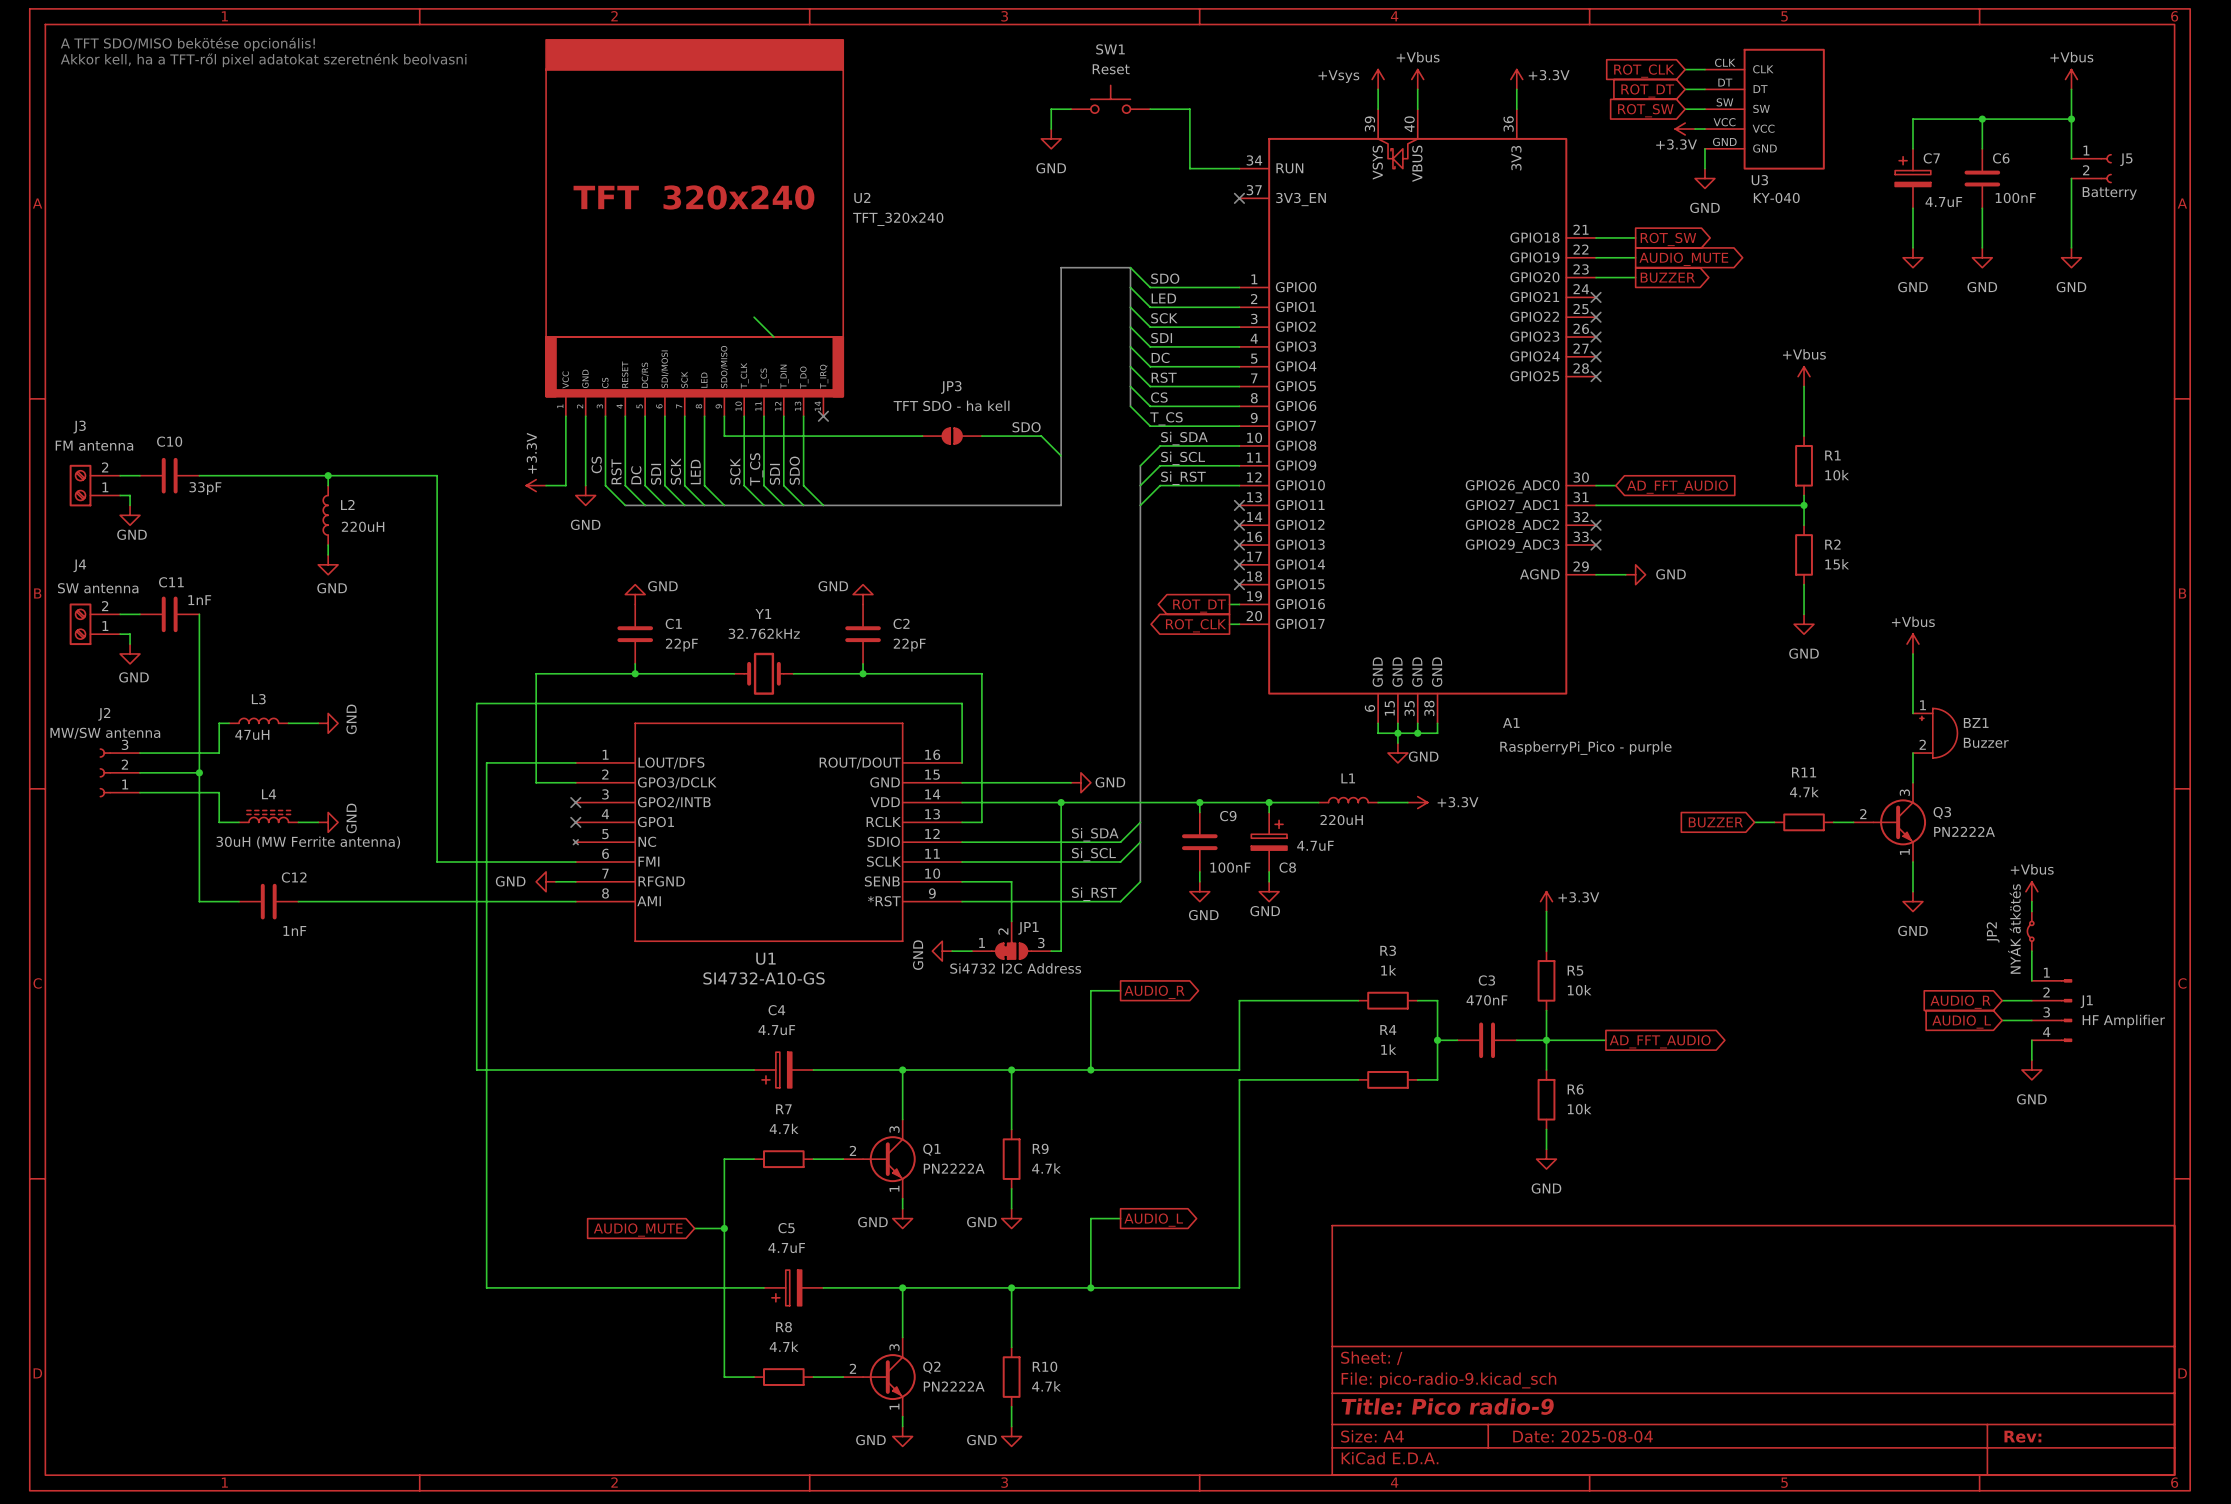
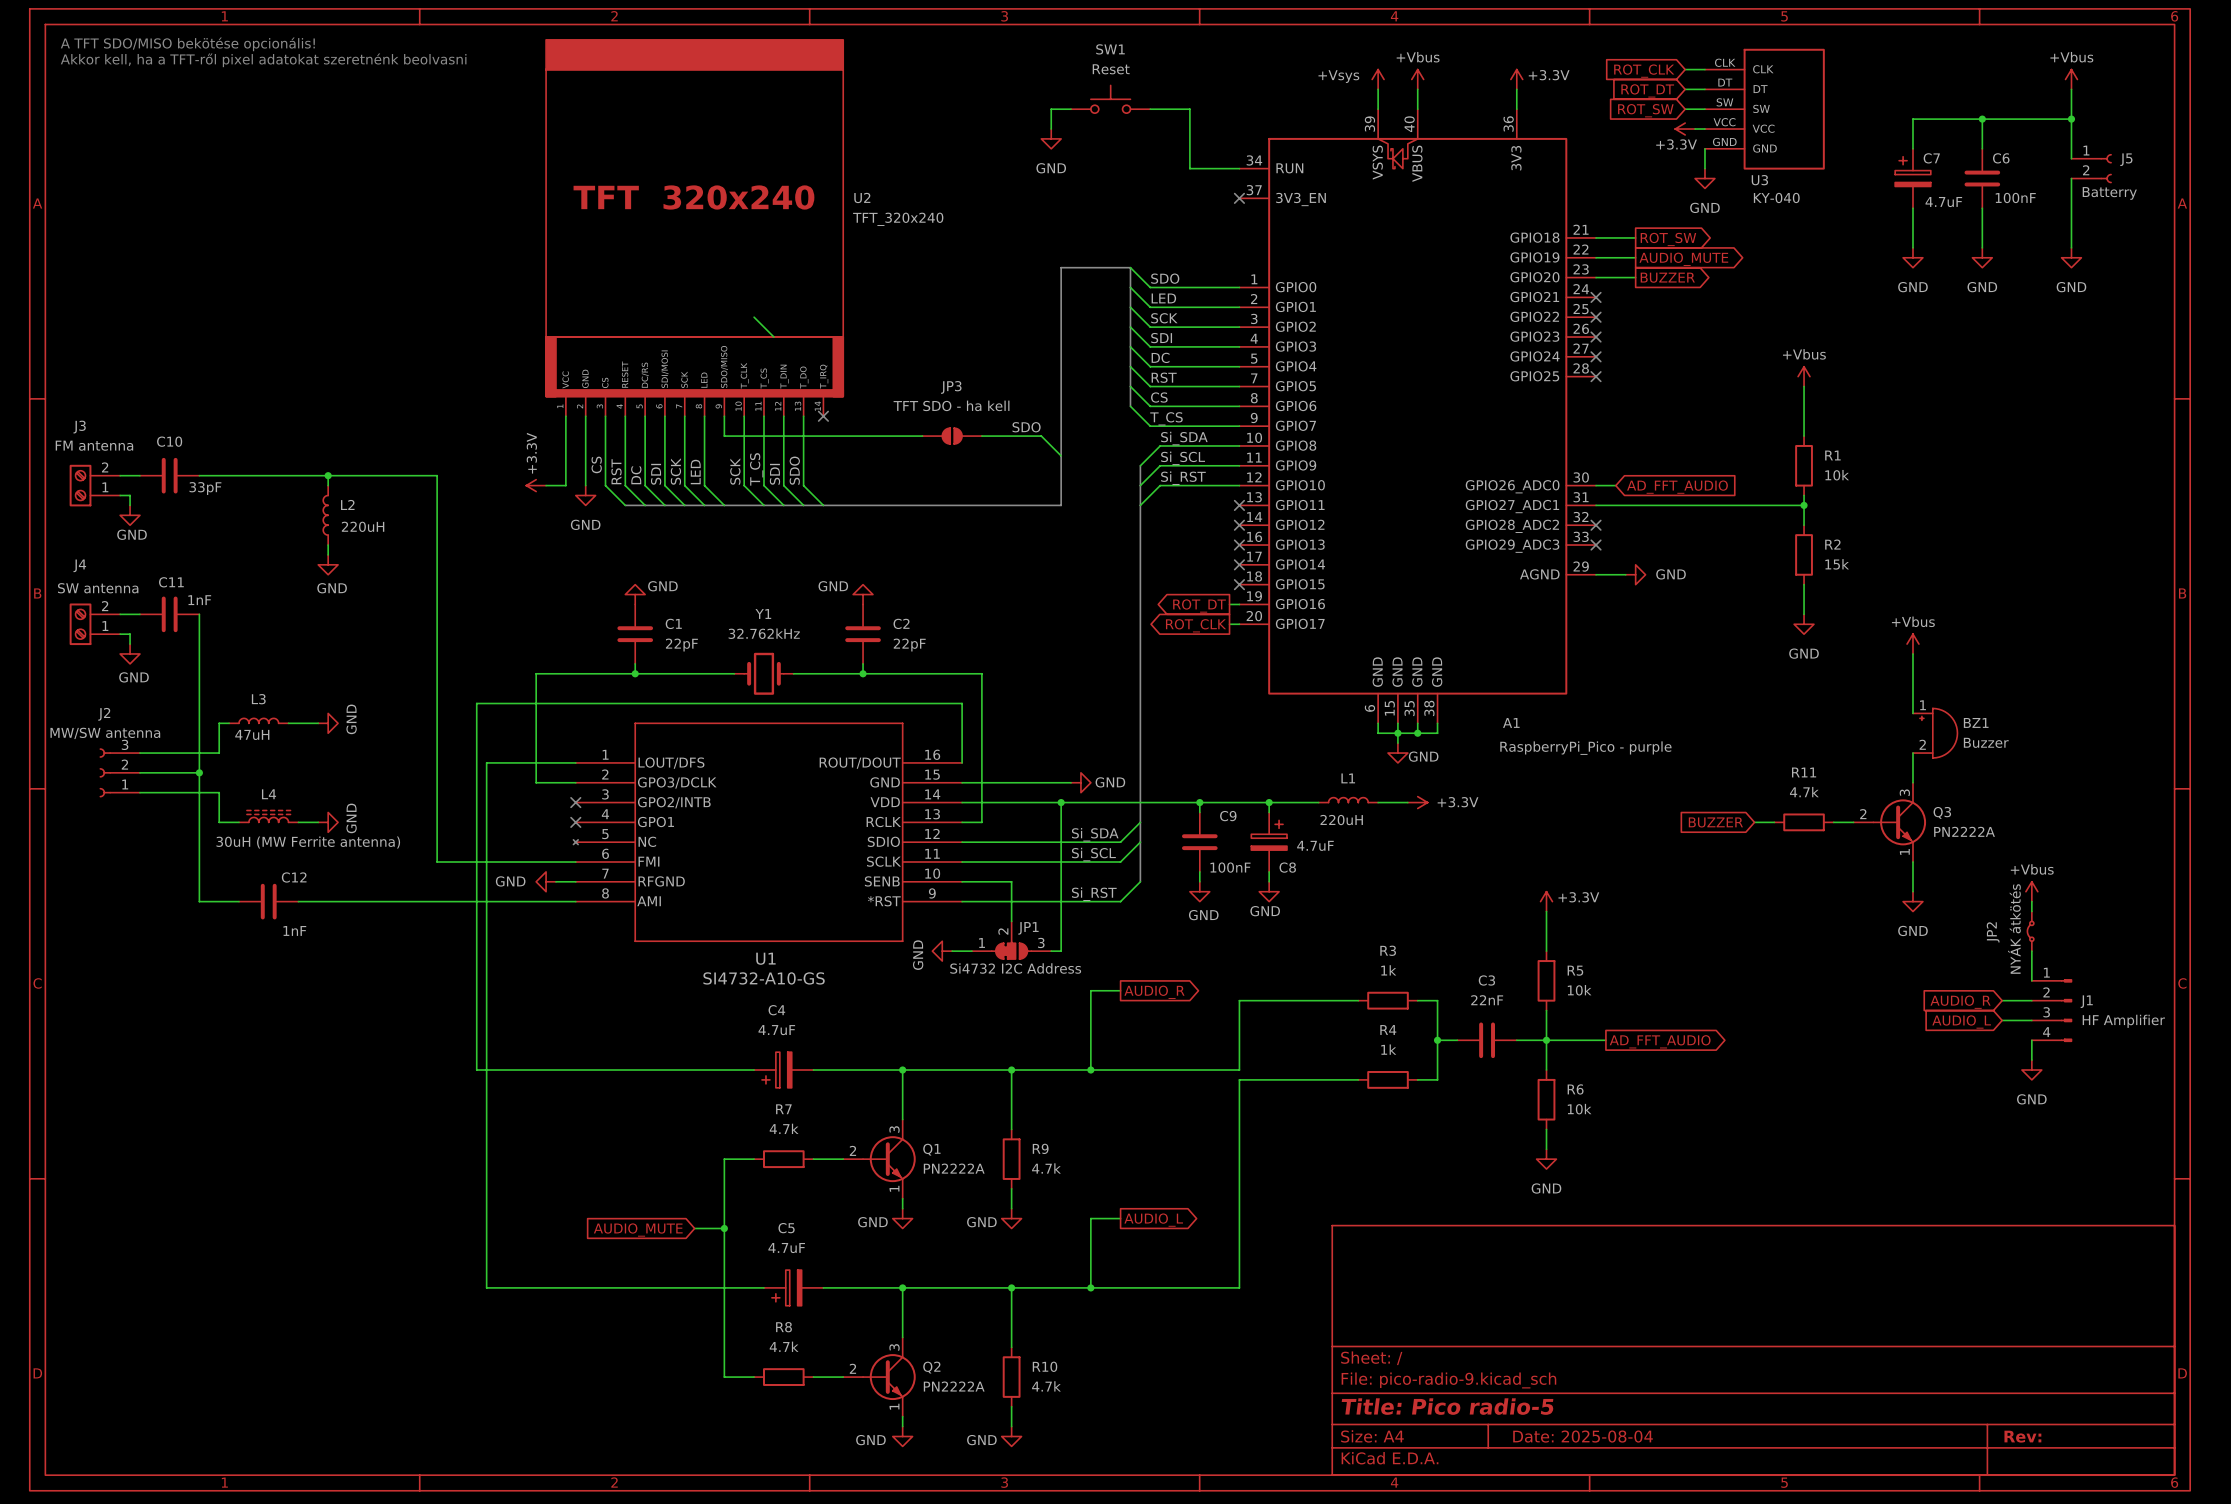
C3 value: 470nF (1487, 1000) -> 22nF (1487, 1000)
title block: Title: Pico radio-9 (1447, 1406) -> Title: Pico radio-5 (1447, 1406)

